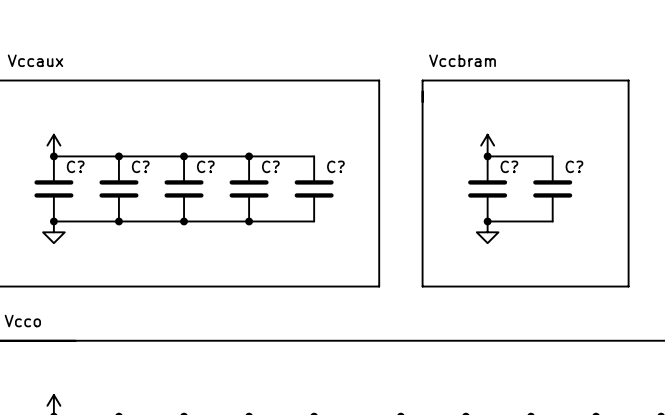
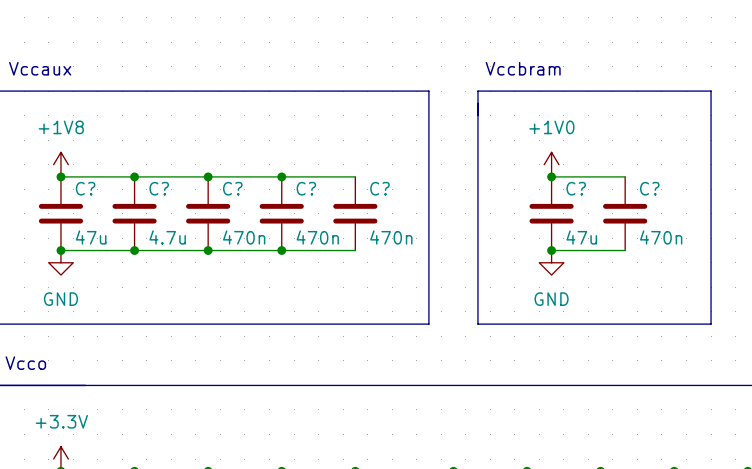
power symbol text: none -> +1V8 (61, 127)
power symbol text: none -> +1V0 (551, 127)
C? value: none -> 47u (91, 237)
C? value: none -> 4.7u (167, 237)
C? value: none -> 470n (244, 237)
C? value: none -> 470n (317, 237)
C? value: none -> 470n (391, 237)
C? value: none -> 47u (581, 237)
C? value: none -> 470n (661, 237)
power symbol text: none -> GND (60, 299)
power symbol text: none -> GND (551, 299)
power symbol text: none -> +3.3V (61, 421)

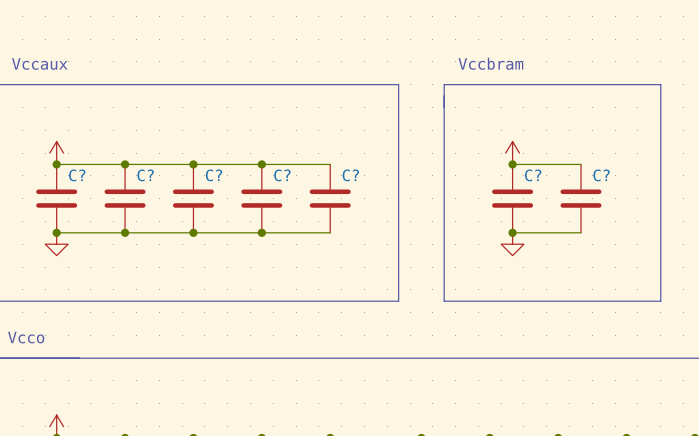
power symbol text: +1V8 (61, 127) -> none
power symbol text: +1V0 (551, 127) -> none
C? value: 47u (91, 237) -> none
C? value: 4.7u (167, 237) -> none
C? value: 470n (244, 237) -> none
C? value: 470n (317, 237) -> none
C? value: 470n (391, 237) -> none
C? value: 47u (581, 237) -> none
C? value: 470n (661, 237) -> none
power symbol text: GND (60, 299) -> none
power symbol text: GND (551, 299) -> none
power symbol text: +3.3V (61, 421) -> none

